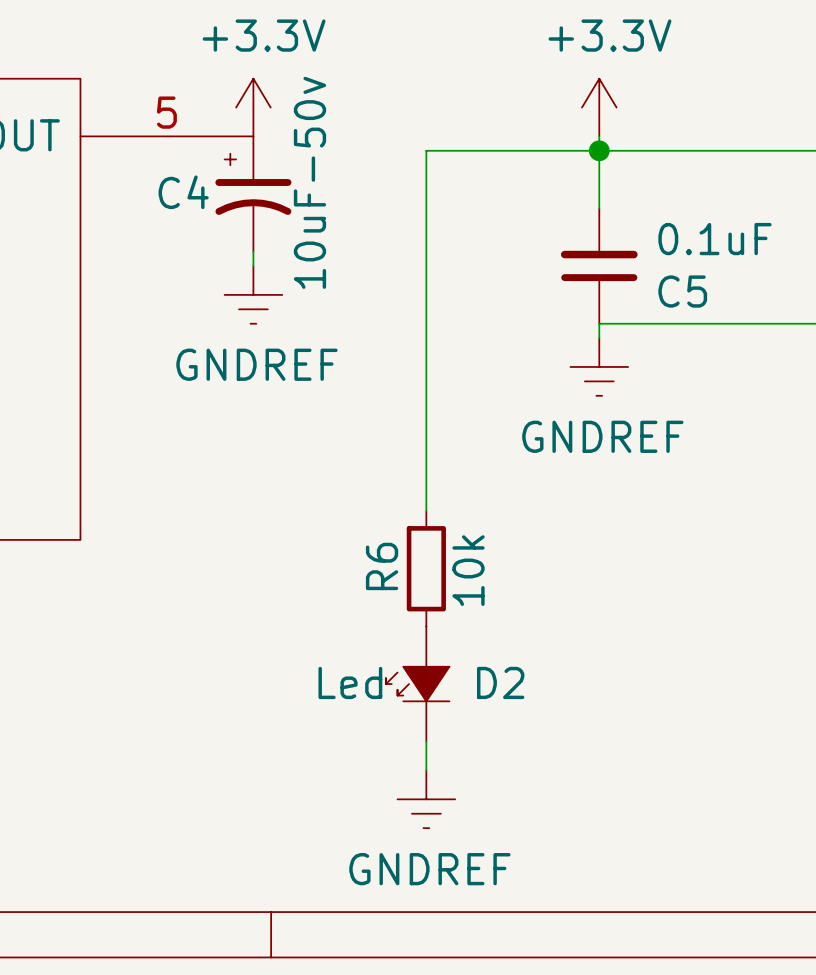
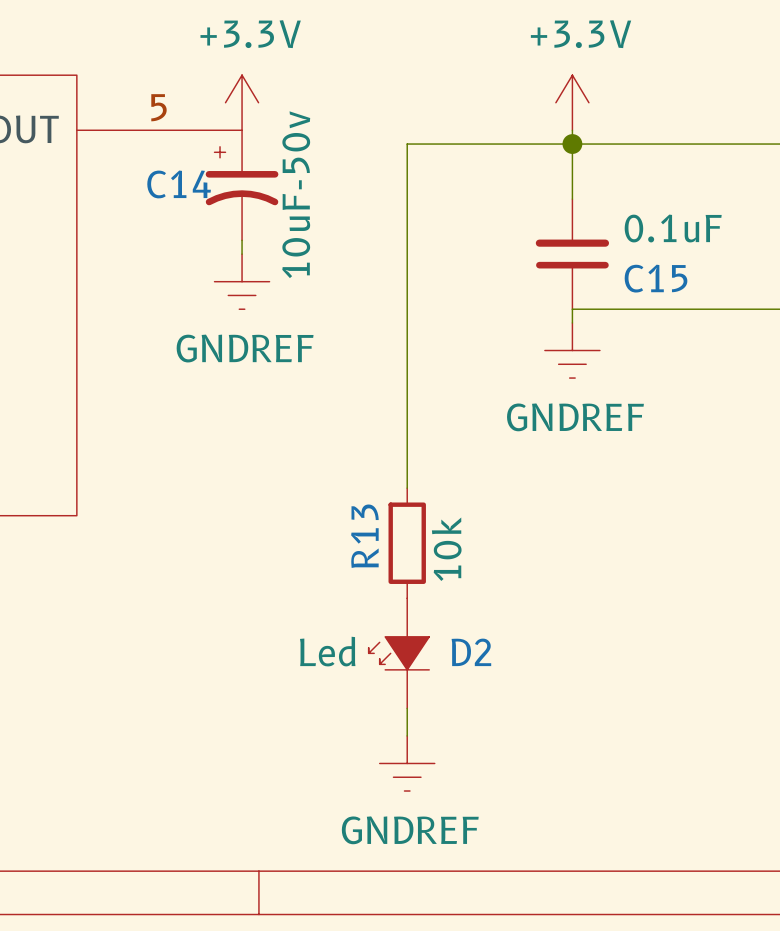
C4 name: C4 (183, 192) -> C14 (179, 184)
C5 name: C5 (682, 291) -> C15 (656, 278)
R6 name: R6 (382, 566) -> R13 (364, 536)

